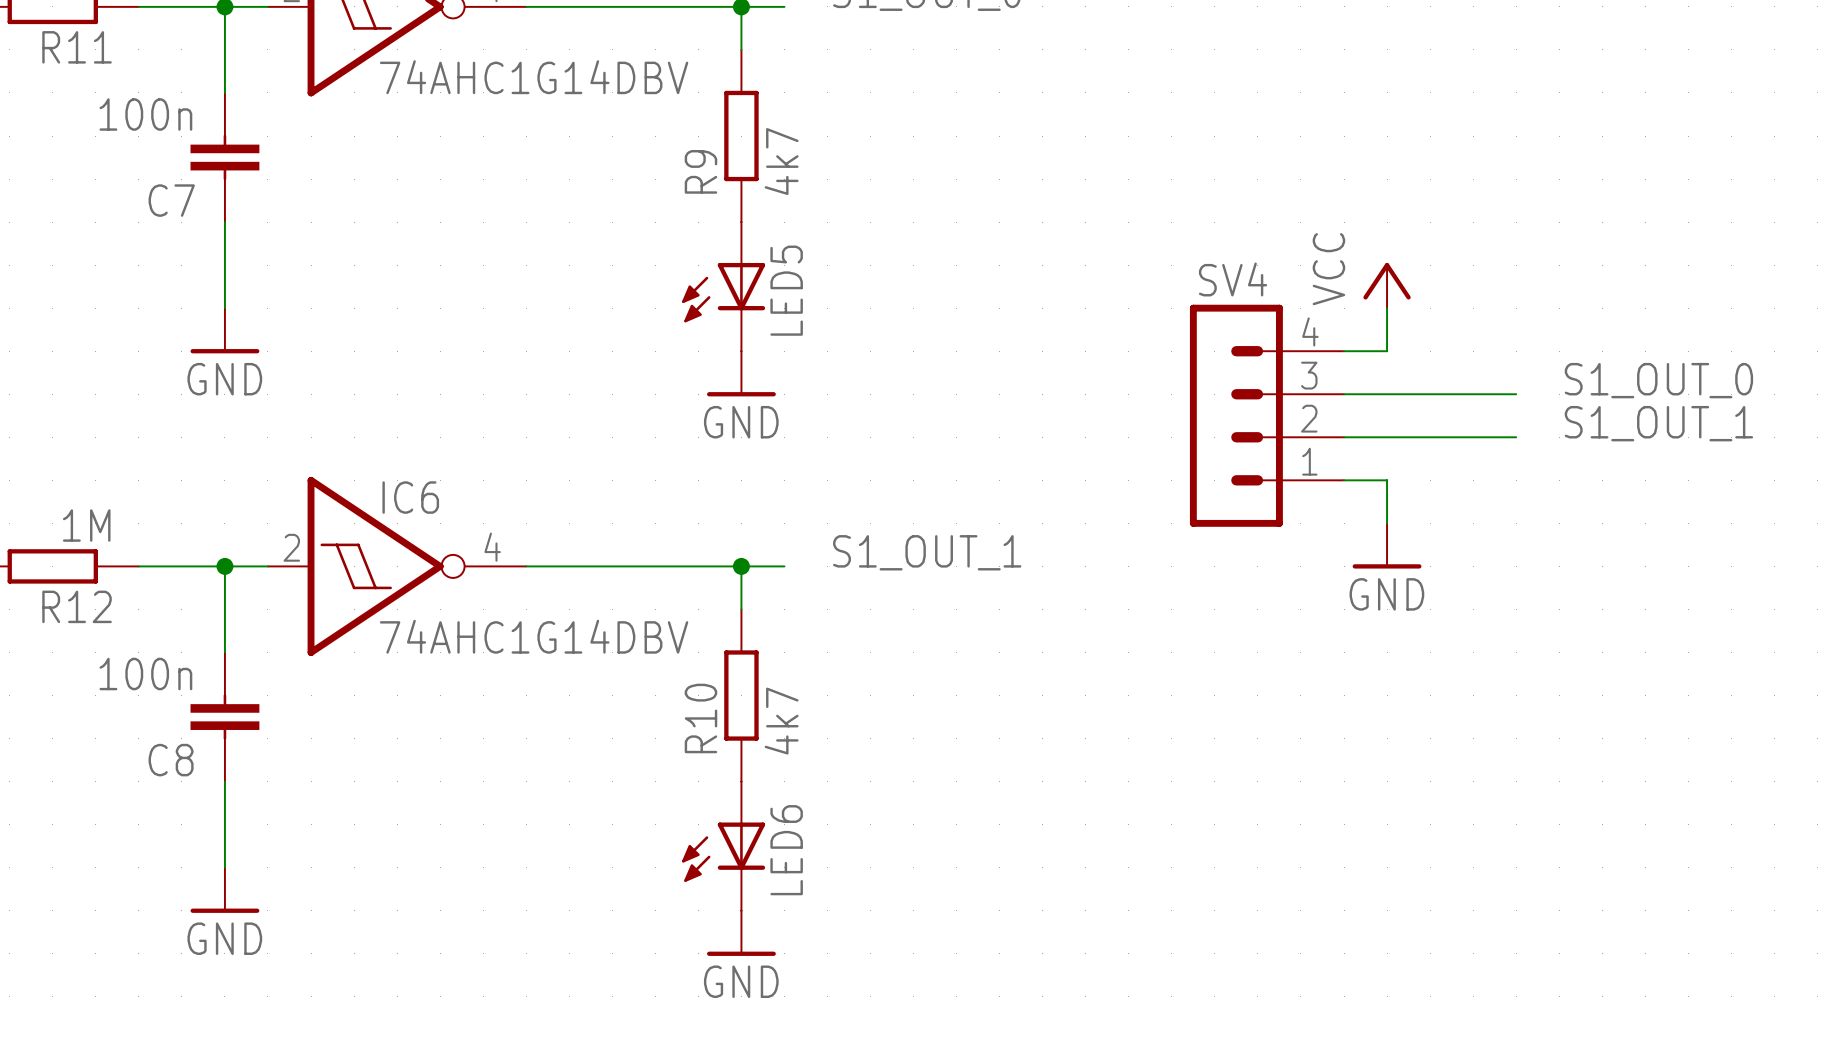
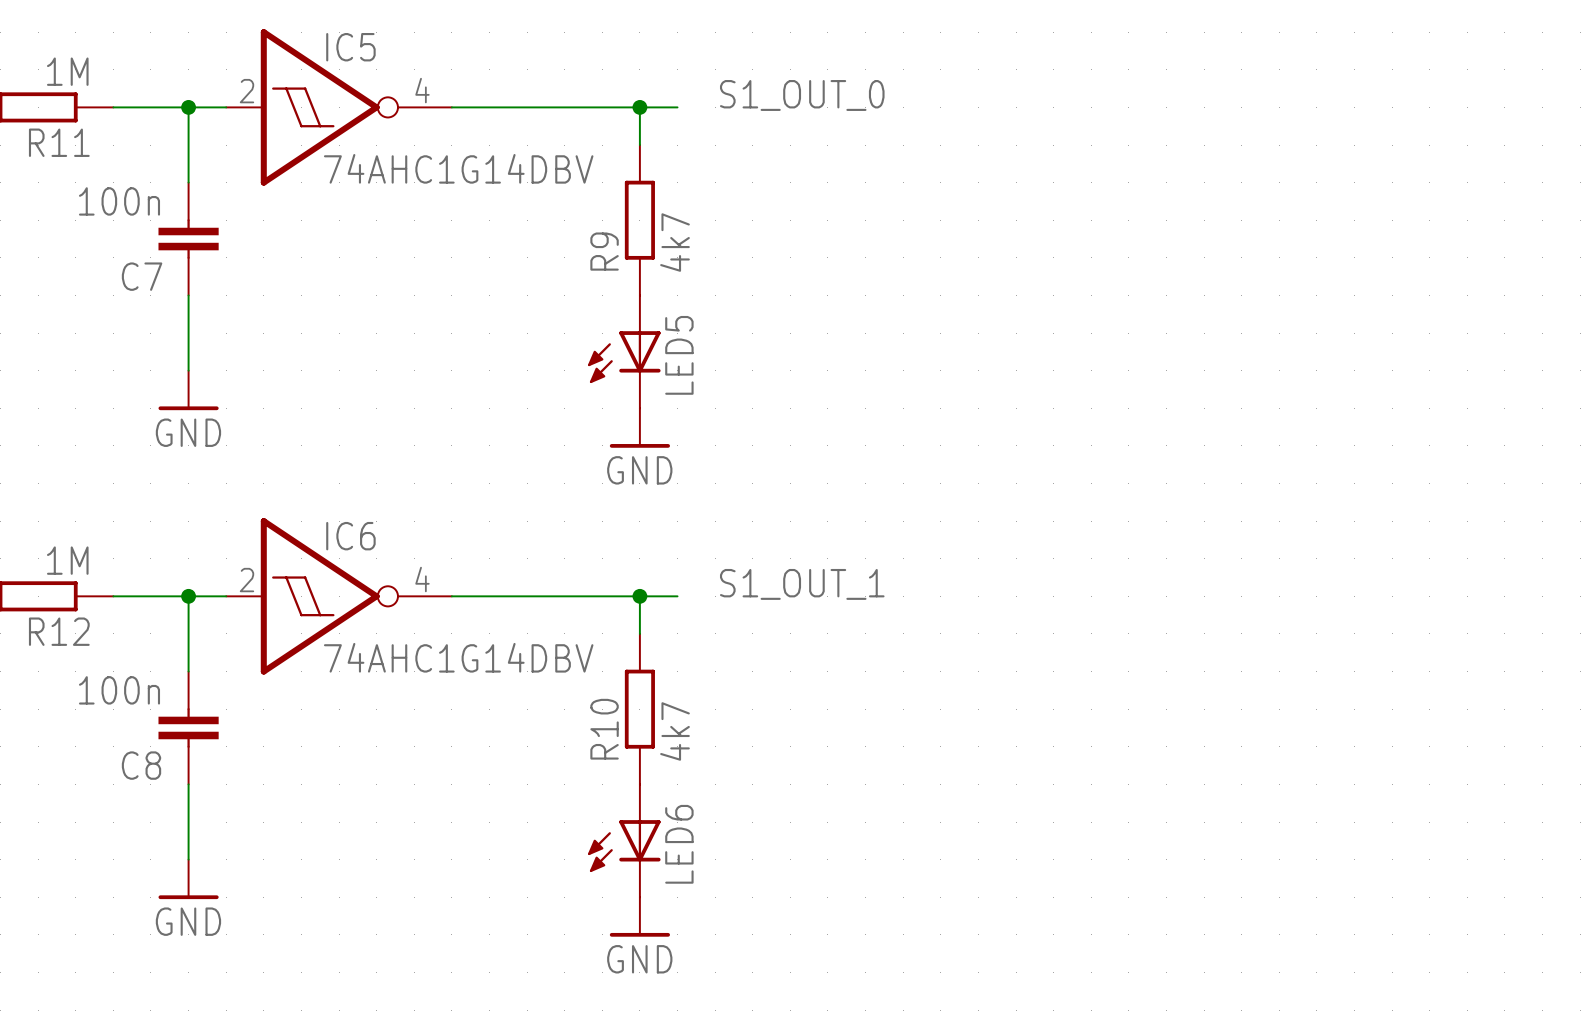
power symbol: VCC (1387, 285) -> none
wire: (1387, 308) (1387, 351) (1344, 351) -> none
label: S1_OUT_0 (1658, 380) -> none
wire: (1344, 394) (1516, 394) -> none
SV4: (1266, 415) -> none
label: S1_OUT_1 (1658, 423) -> none
wire: (1344, 437) (1516, 437) -> none
wire: (1344, 480) (1387, 480) (1387, 523) -> none
power symbol: GND (1387, 545) -> none

